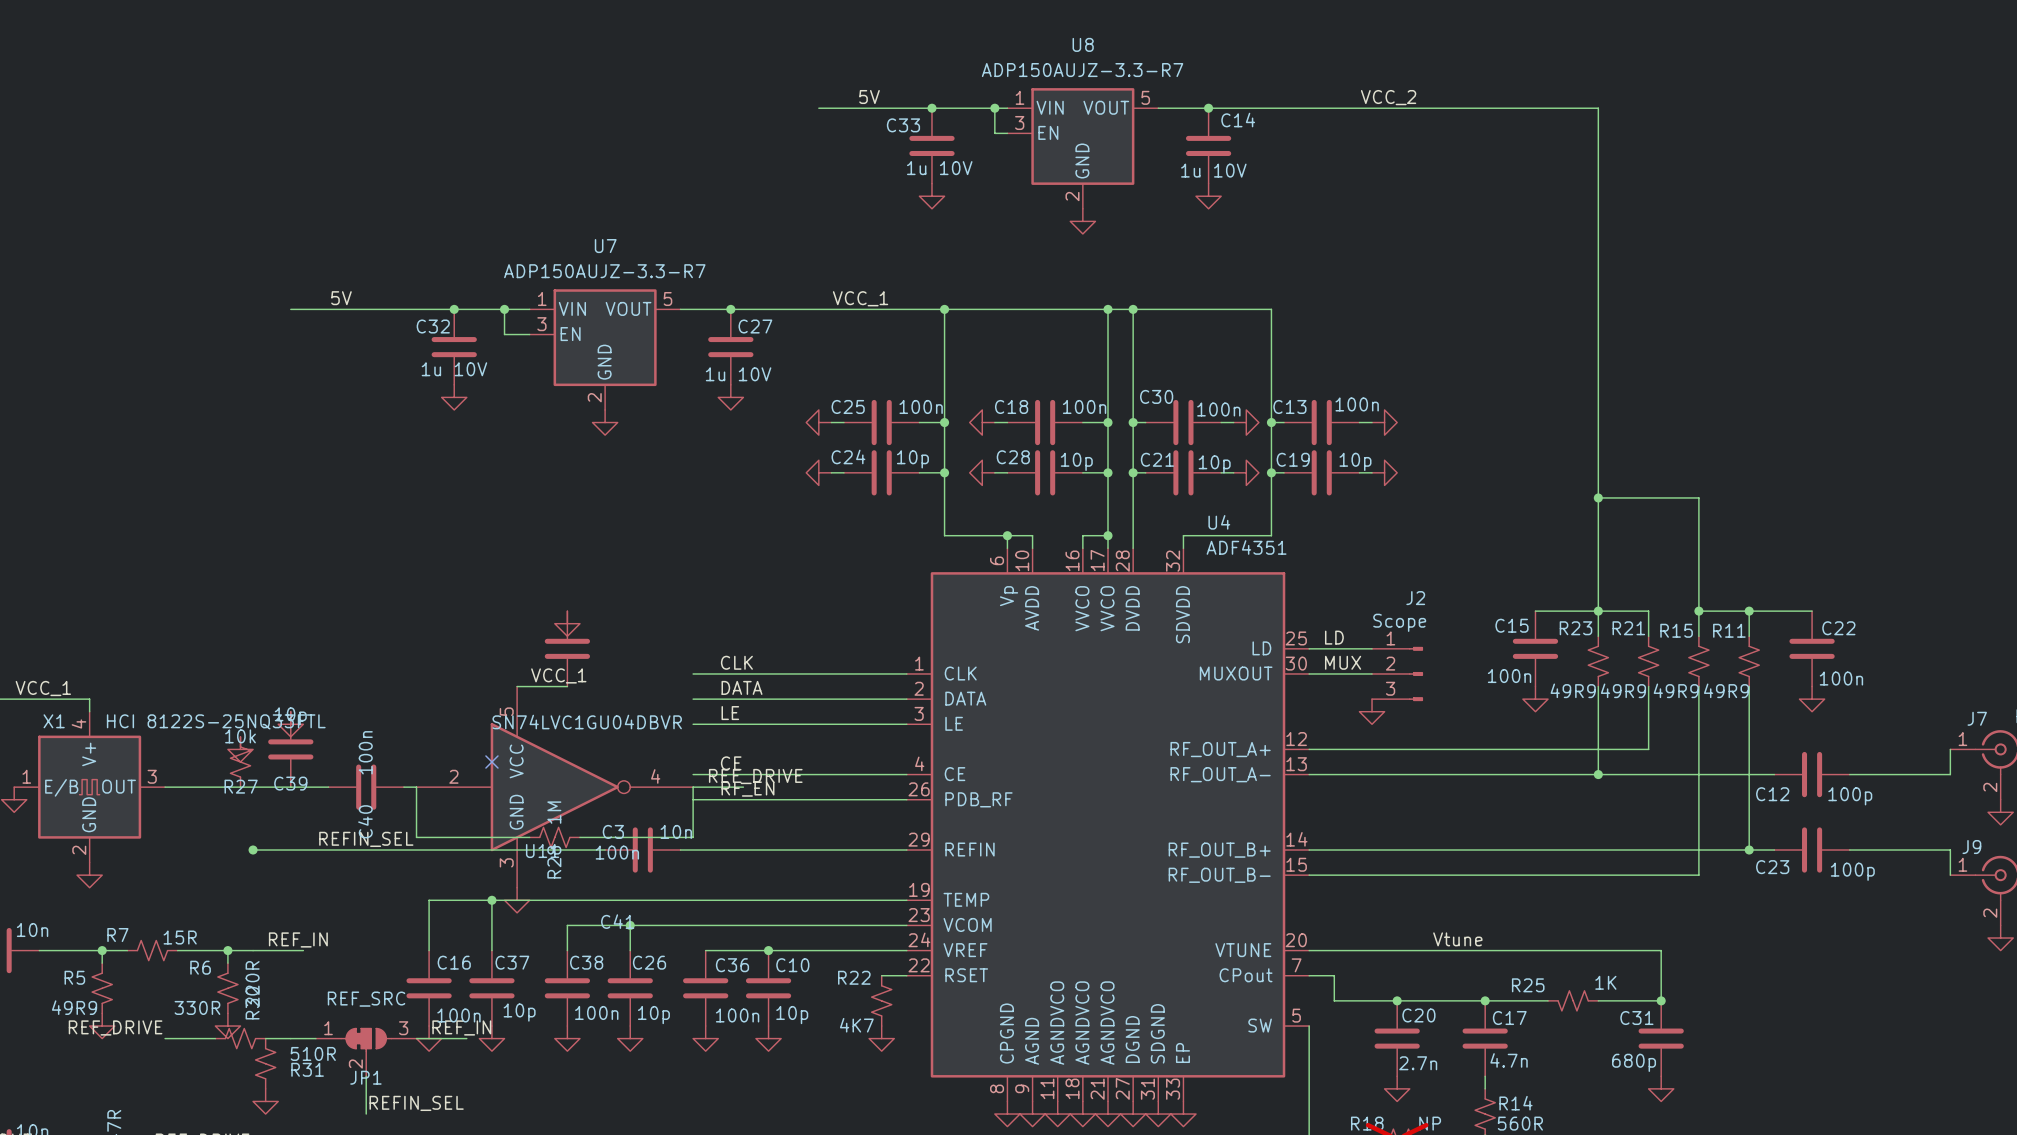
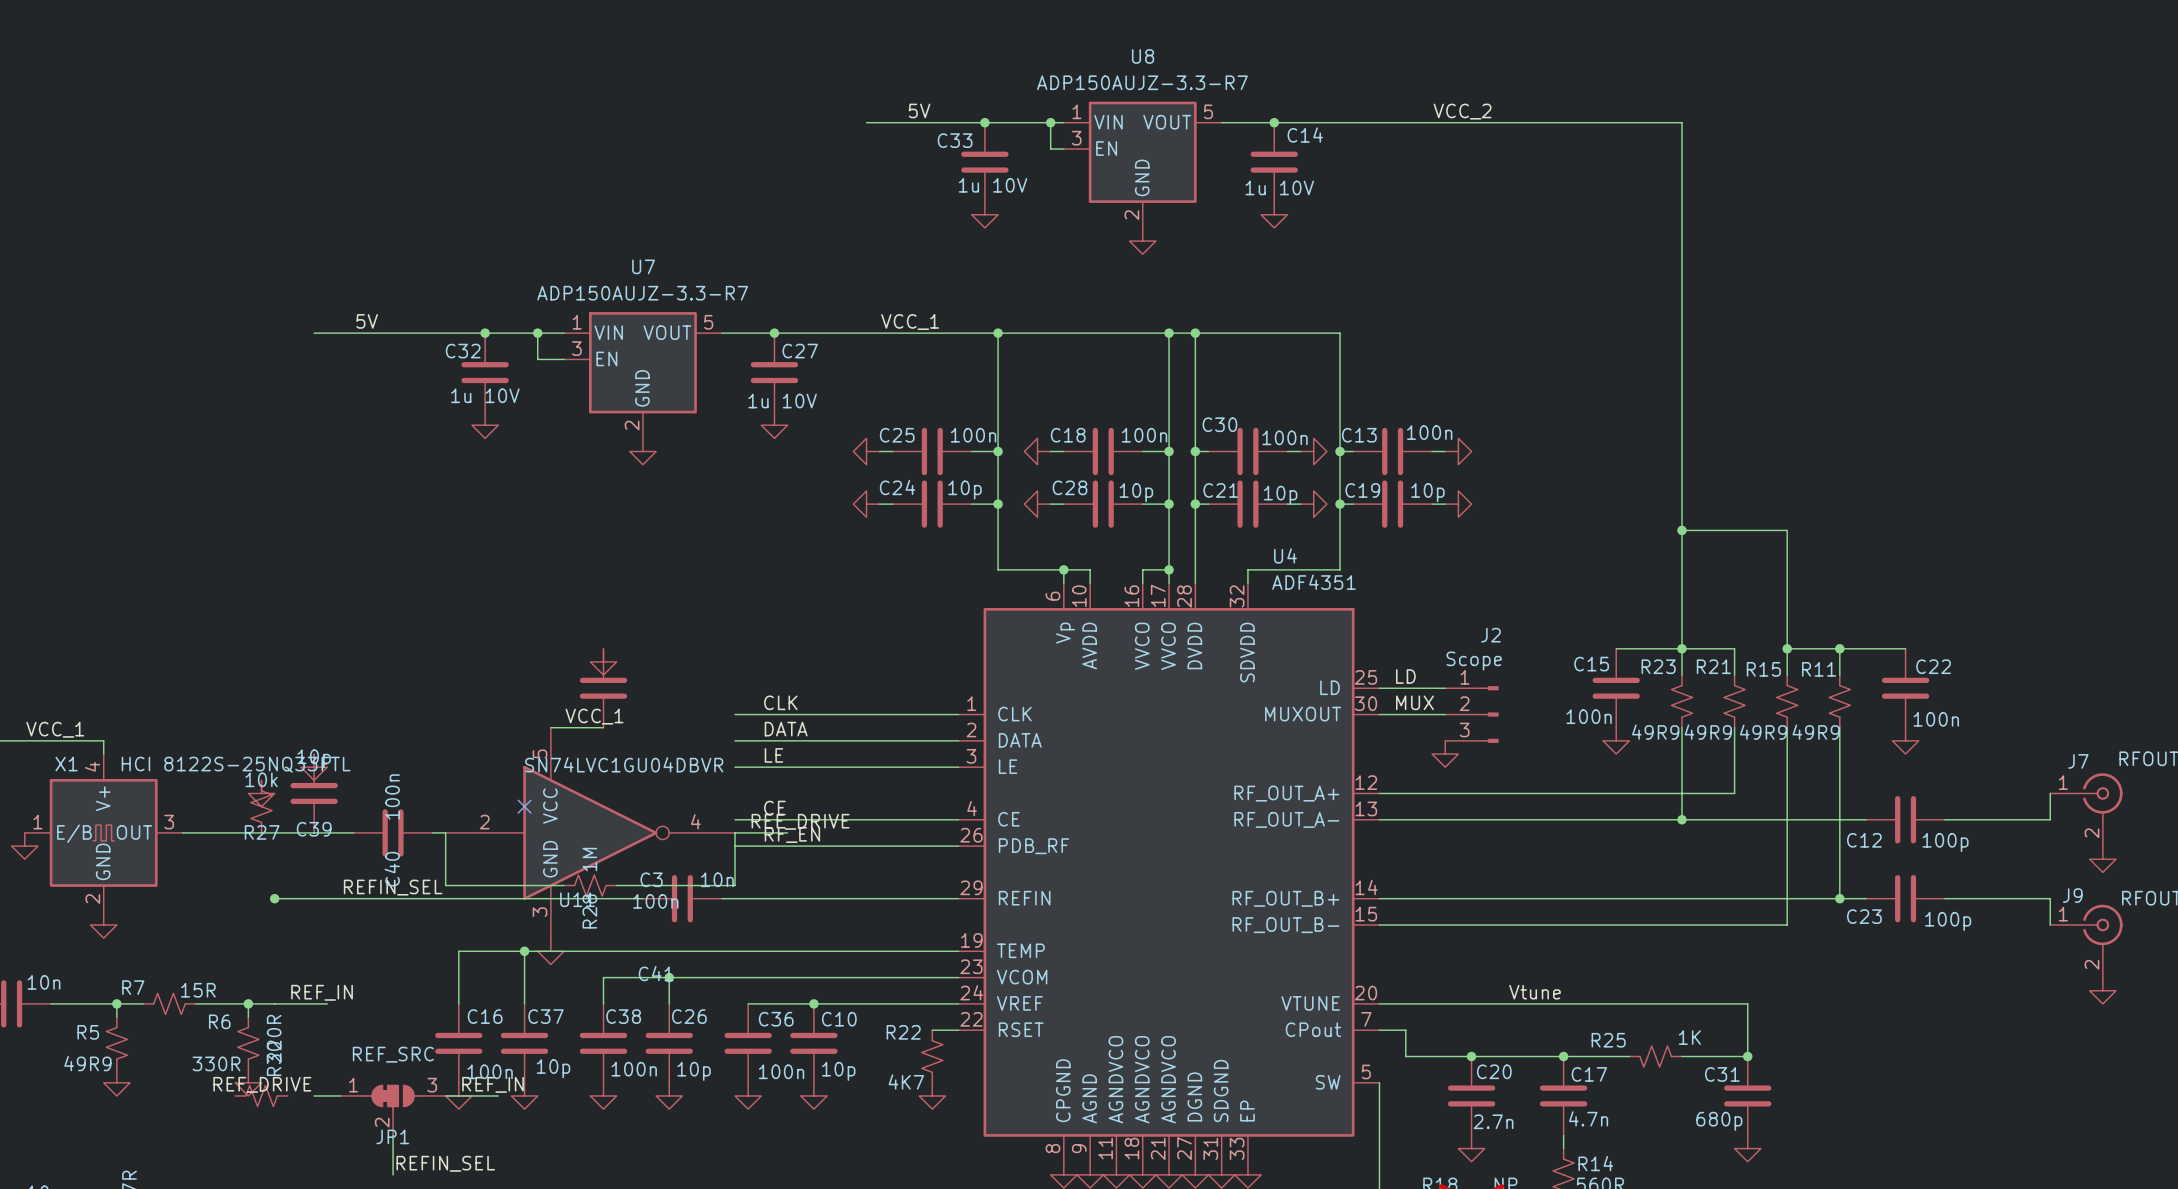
label position: REF_DRIVE (115, 1027) -> REF_DRIVE (262, 1084)
wire: (165, 1038) (215, 1038) -> none
wire: (265, 1038) (290, 1038) -> none
R31: 510R (265, 1063) -> none
power symbol: (265, 1101) -> none

